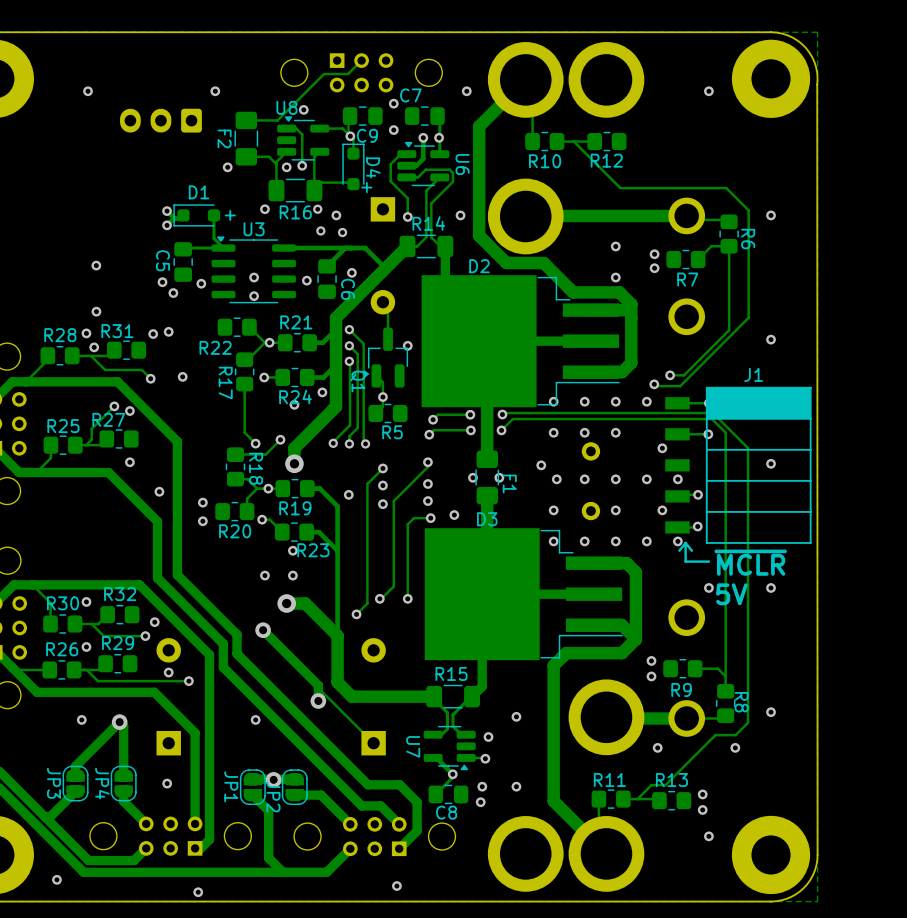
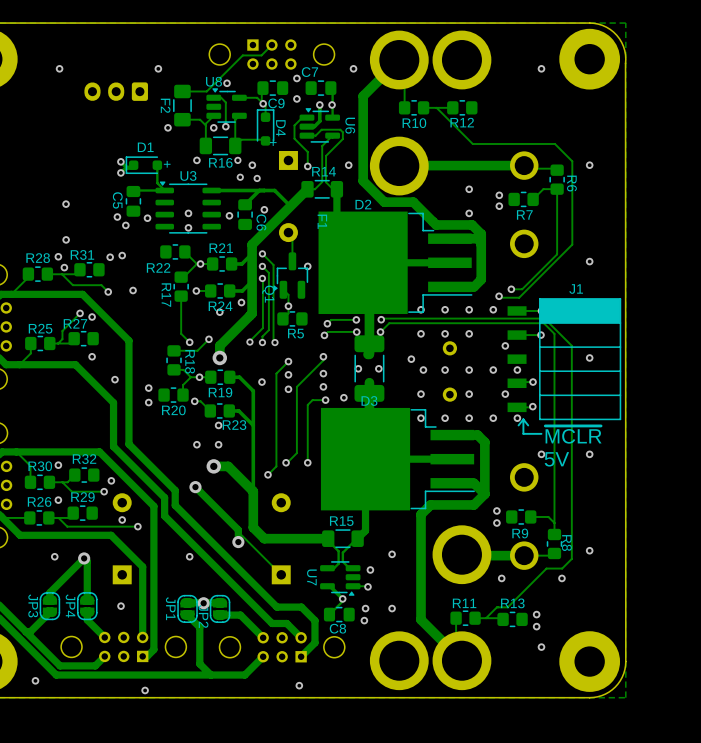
F1 footprint: [475, 450, 500, 505] -> [354, 335, 385, 402]
F1 name position: F1 (509, 483) -> F1 (322, 221)

